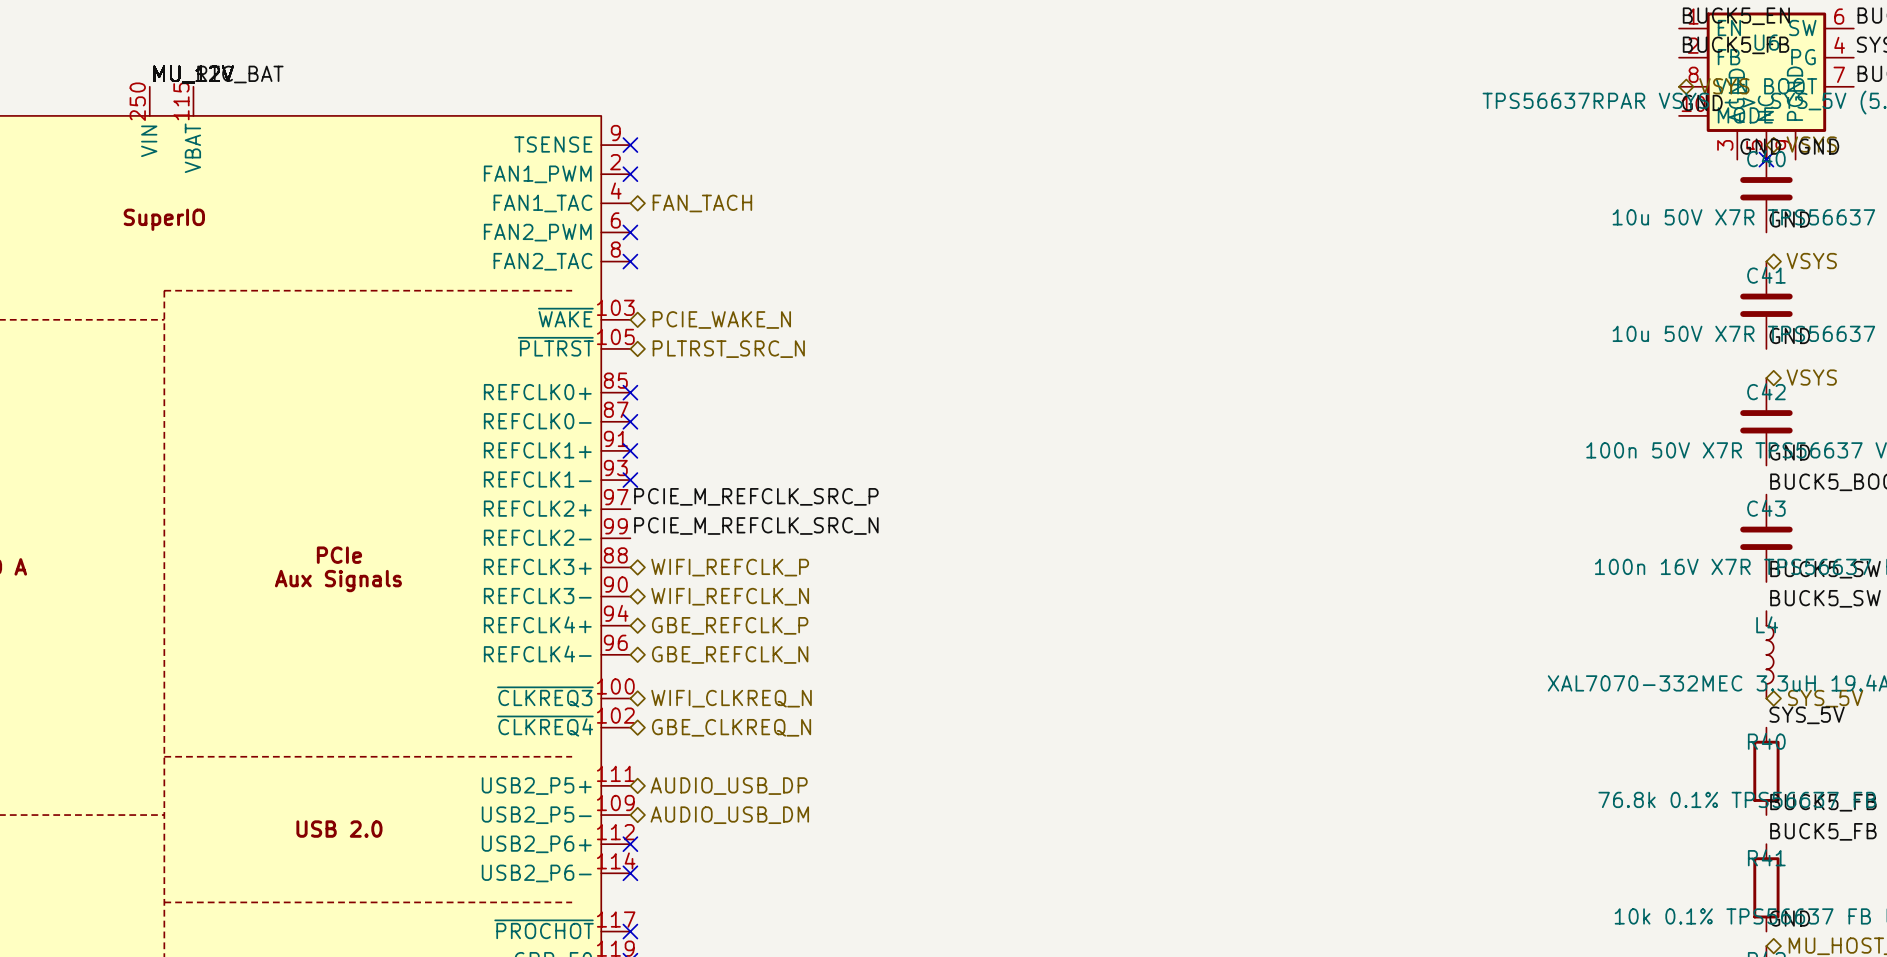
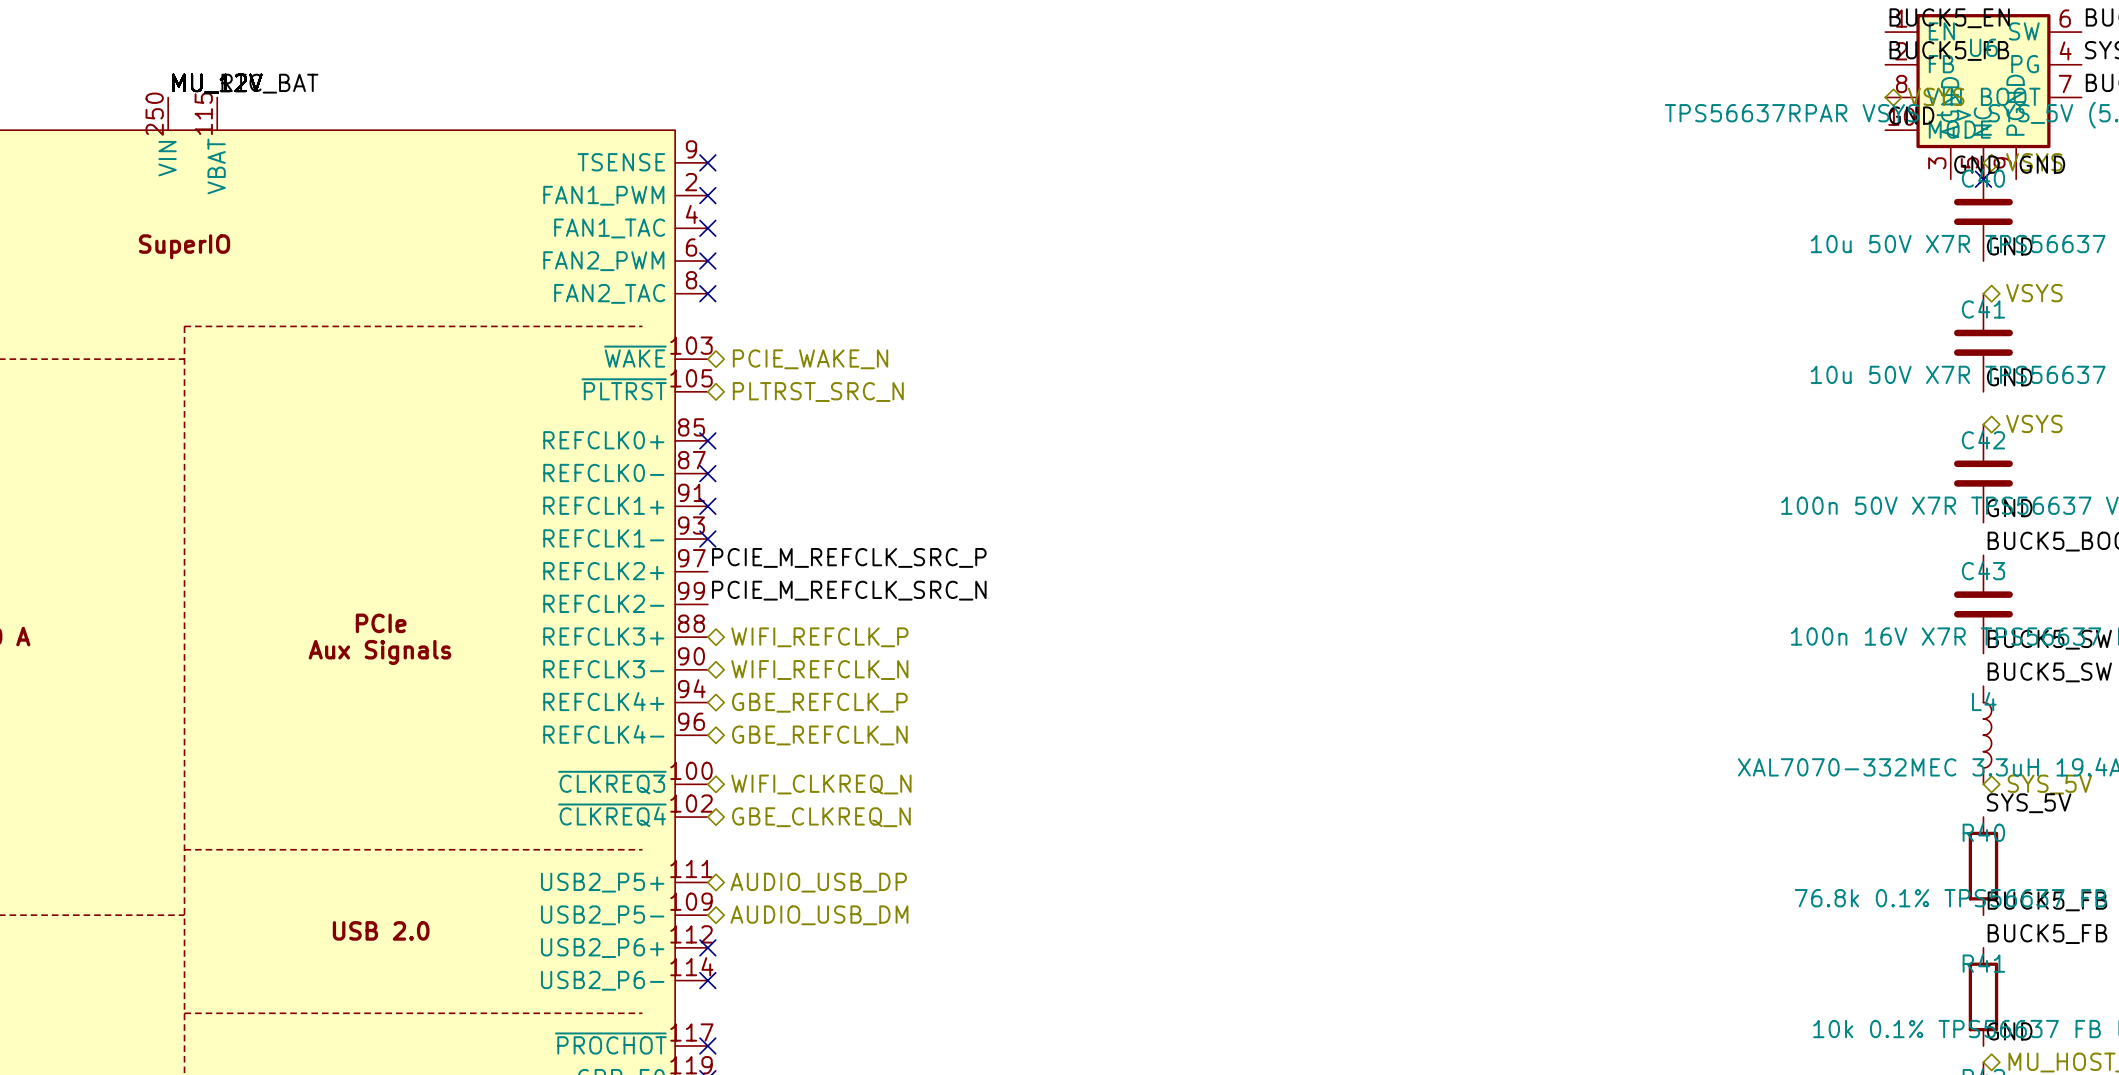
no-connect mark: none -> (707, 228)
hierarchical label: FAN_TACH (702, 203) -> none

